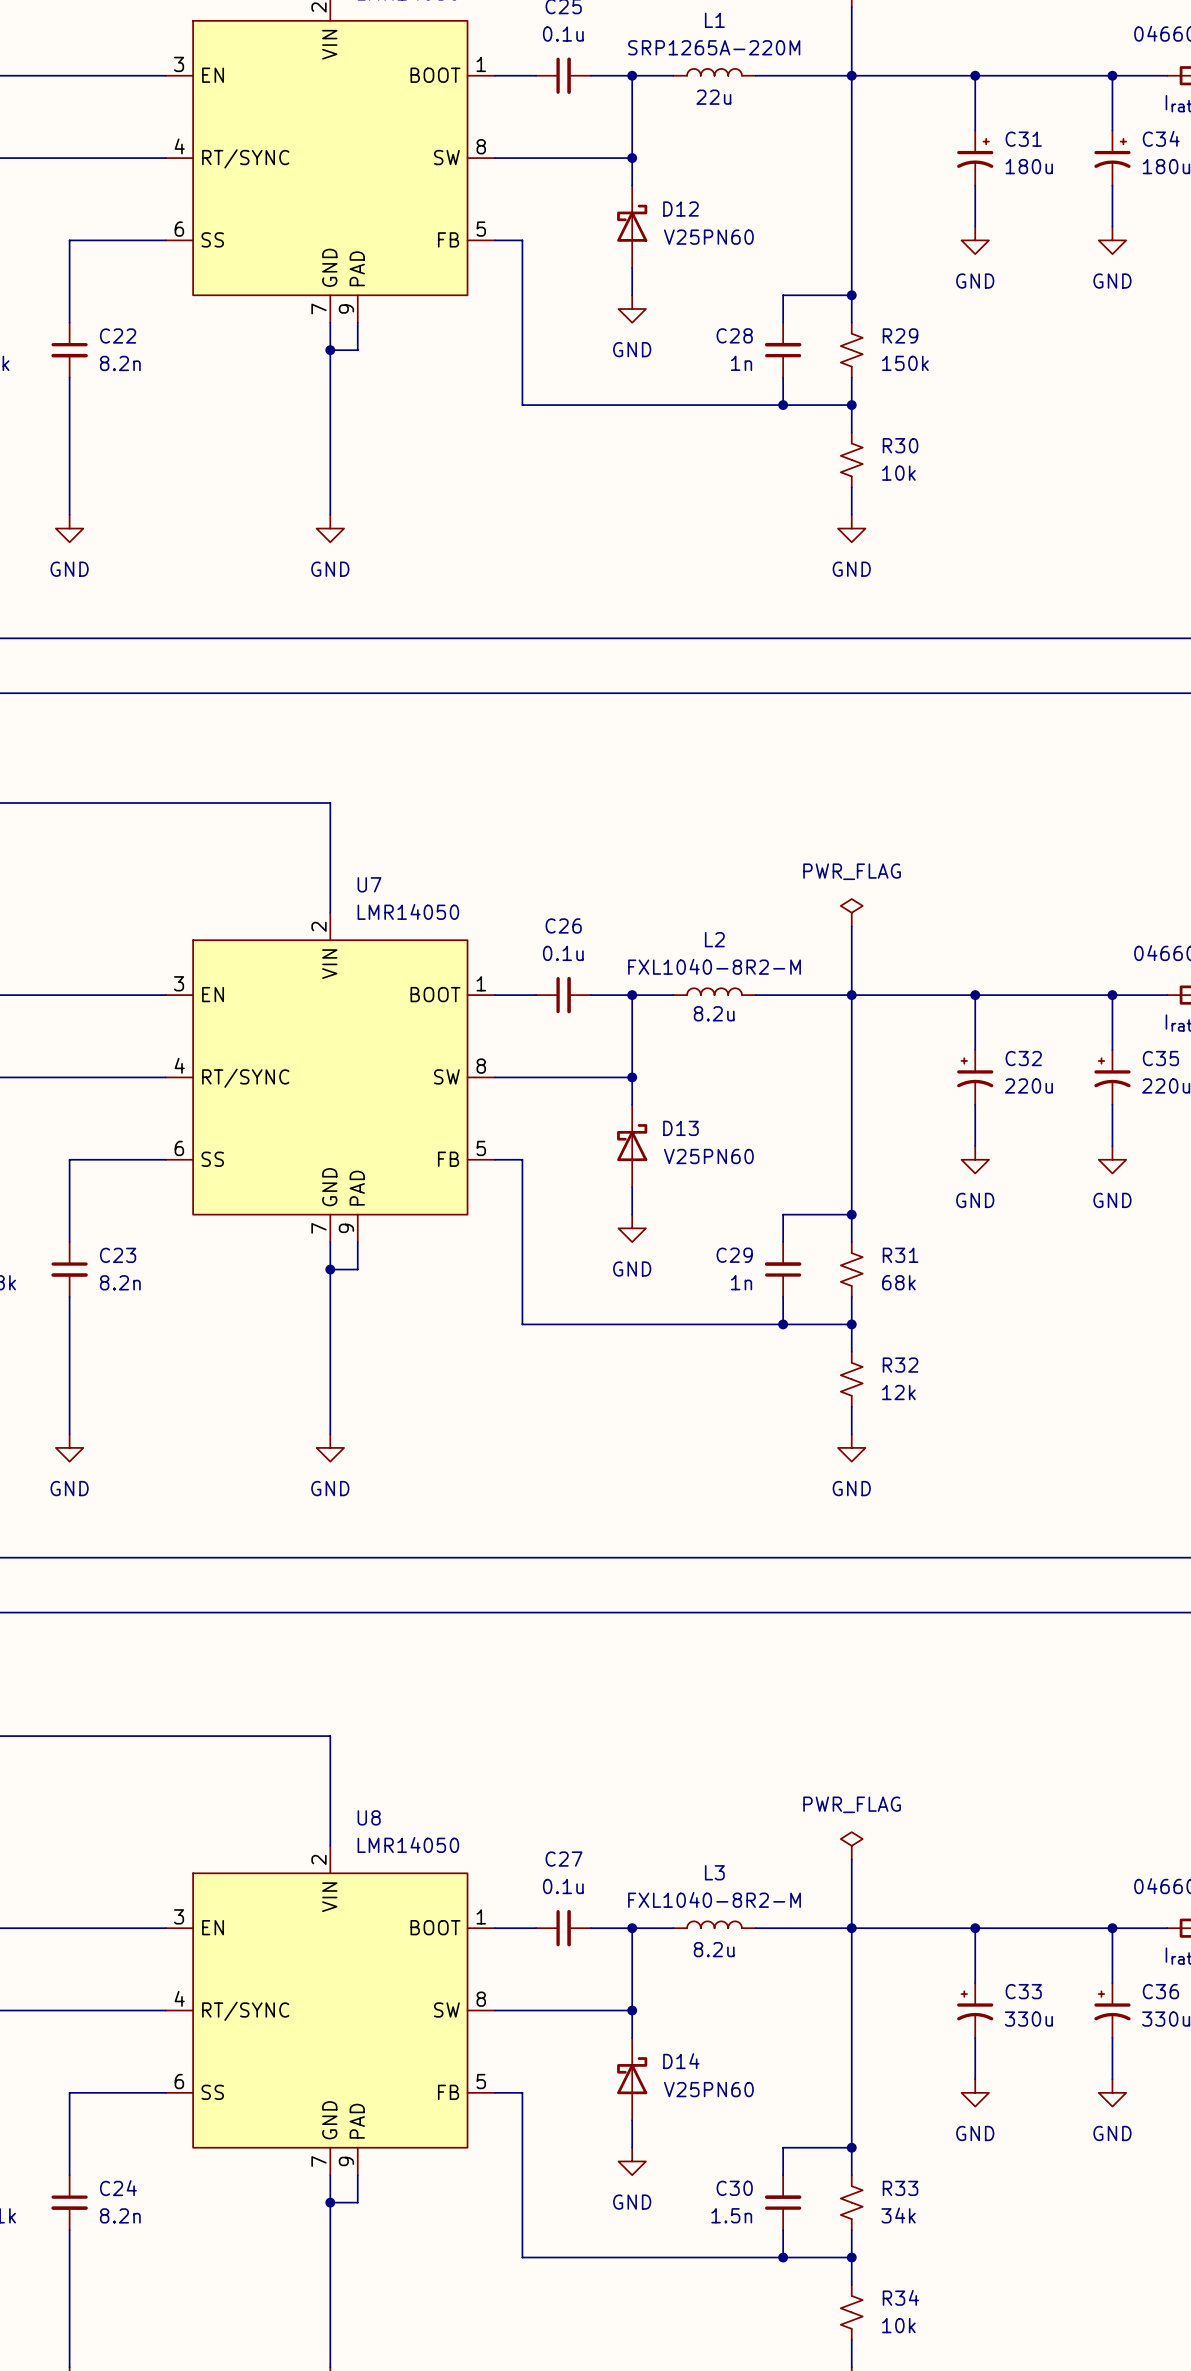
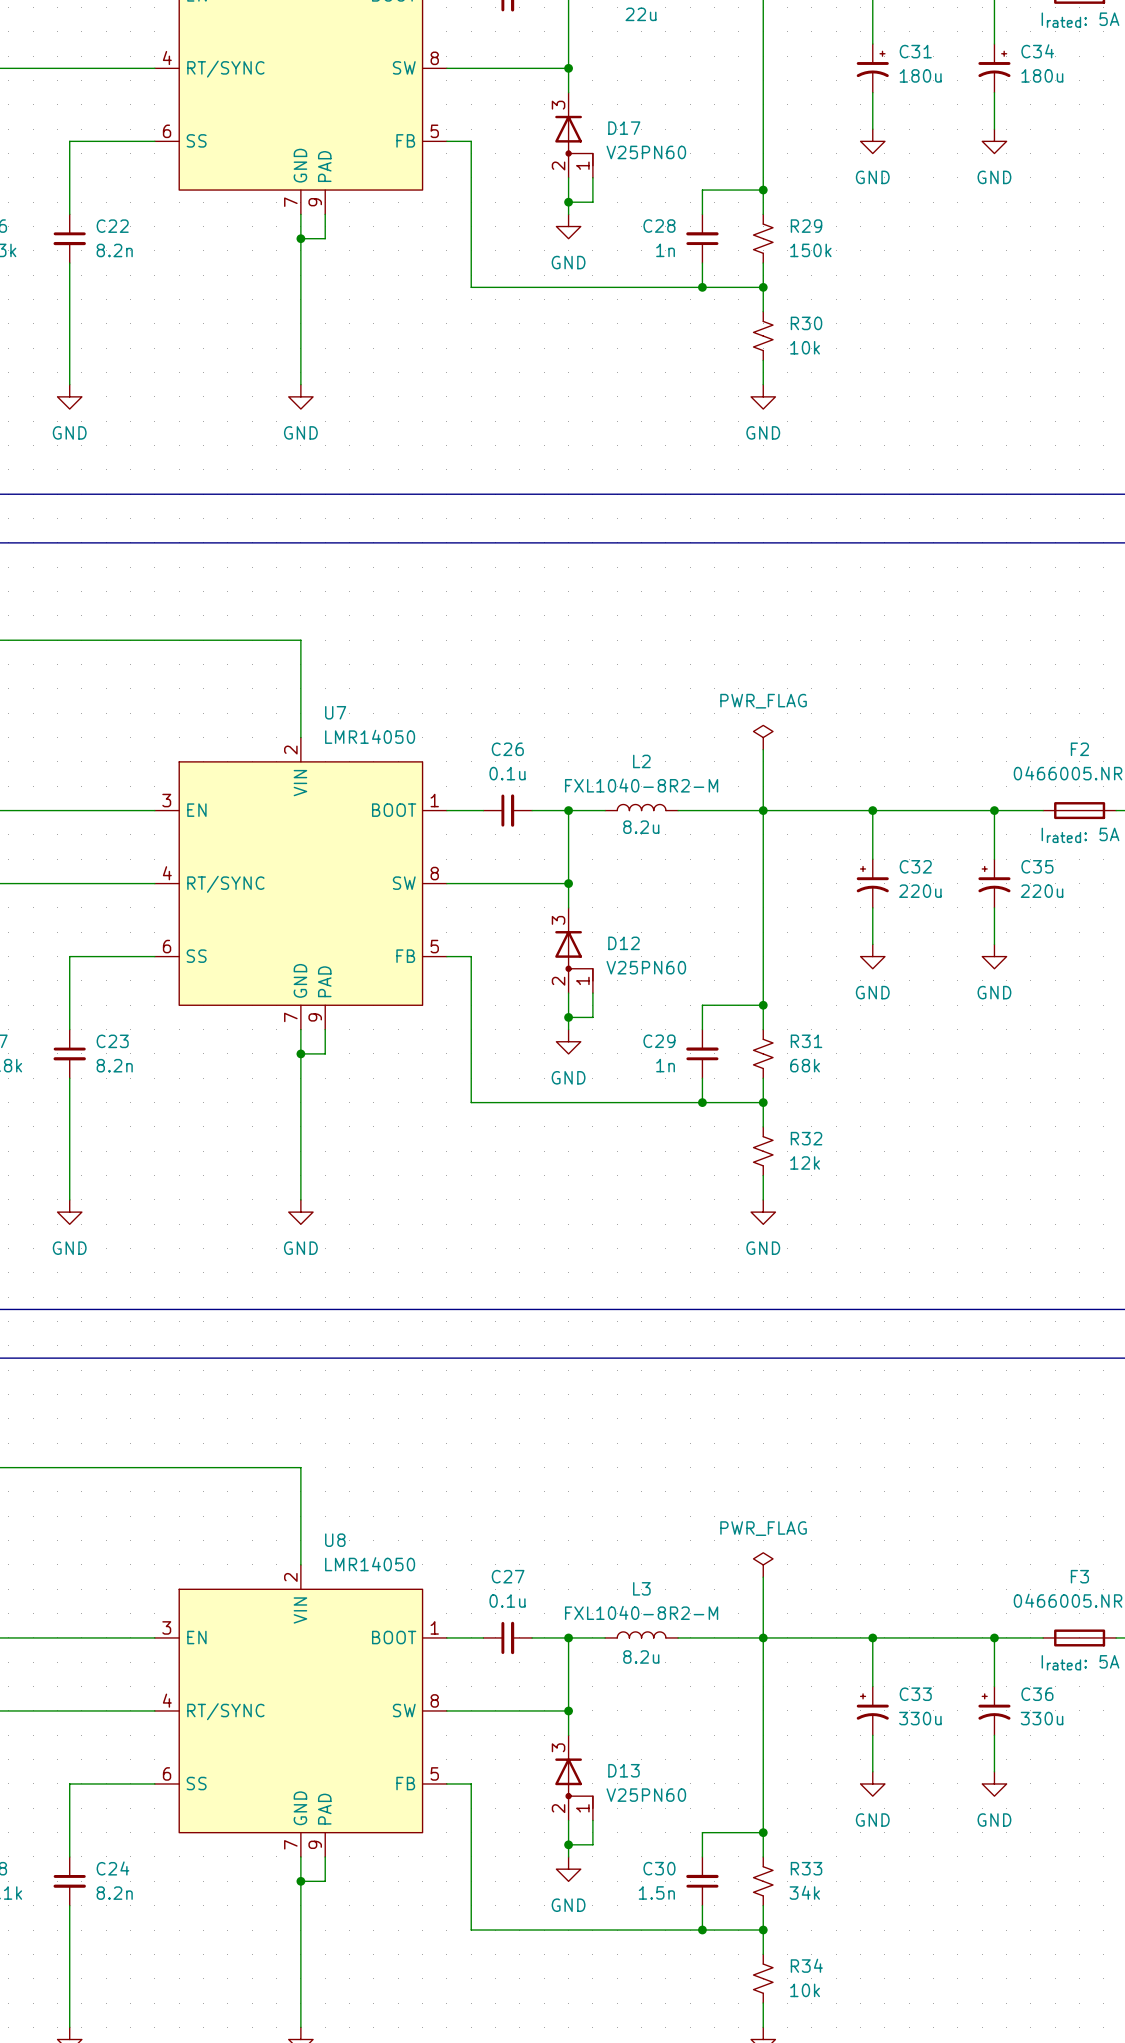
D12 symbol: [617, 185, 648, 268] -> [555, 907, 593, 994]
D17: none -> V25PN60 (574, 135)
wire: none -> (592, 177) (592, 202) (568, 202)
power symbol position: GND (632, 309) -> GND (568, 226)
junction: none -> (568, 202)
D13 symbol: [617, 1104, 648, 1188] -> [555, 1735, 593, 1821]
wire: none -> (592, 993) (592, 1017) (568, 1017)
power symbol position: GND (632, 1228) -> GND (568, 1041)
junction: none -> (568, 1017)
D14: V25PN60 (632, 2079) -> none
wire: none -> (592, 1820) (592, 1844) (568, 1844)
power symbol position: GND (632, 2161) -> GND (568, 1869)
junction: none -> (568, 1844)

